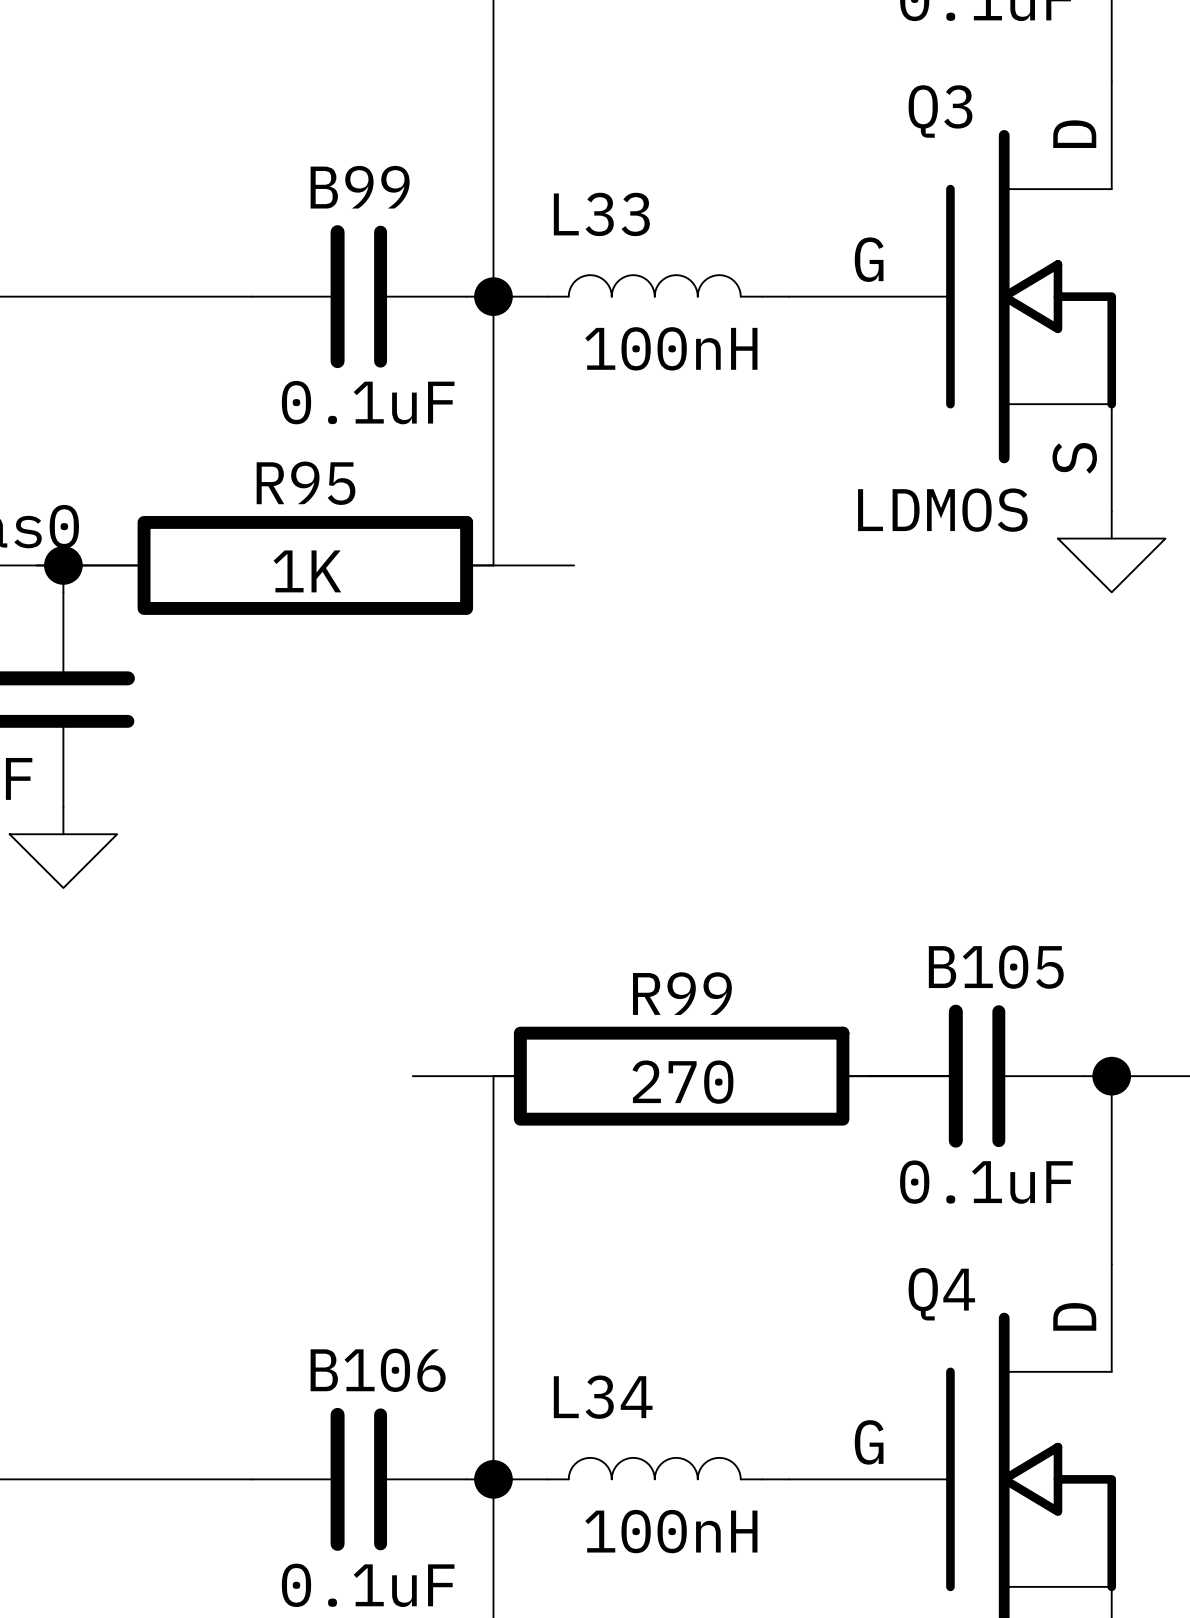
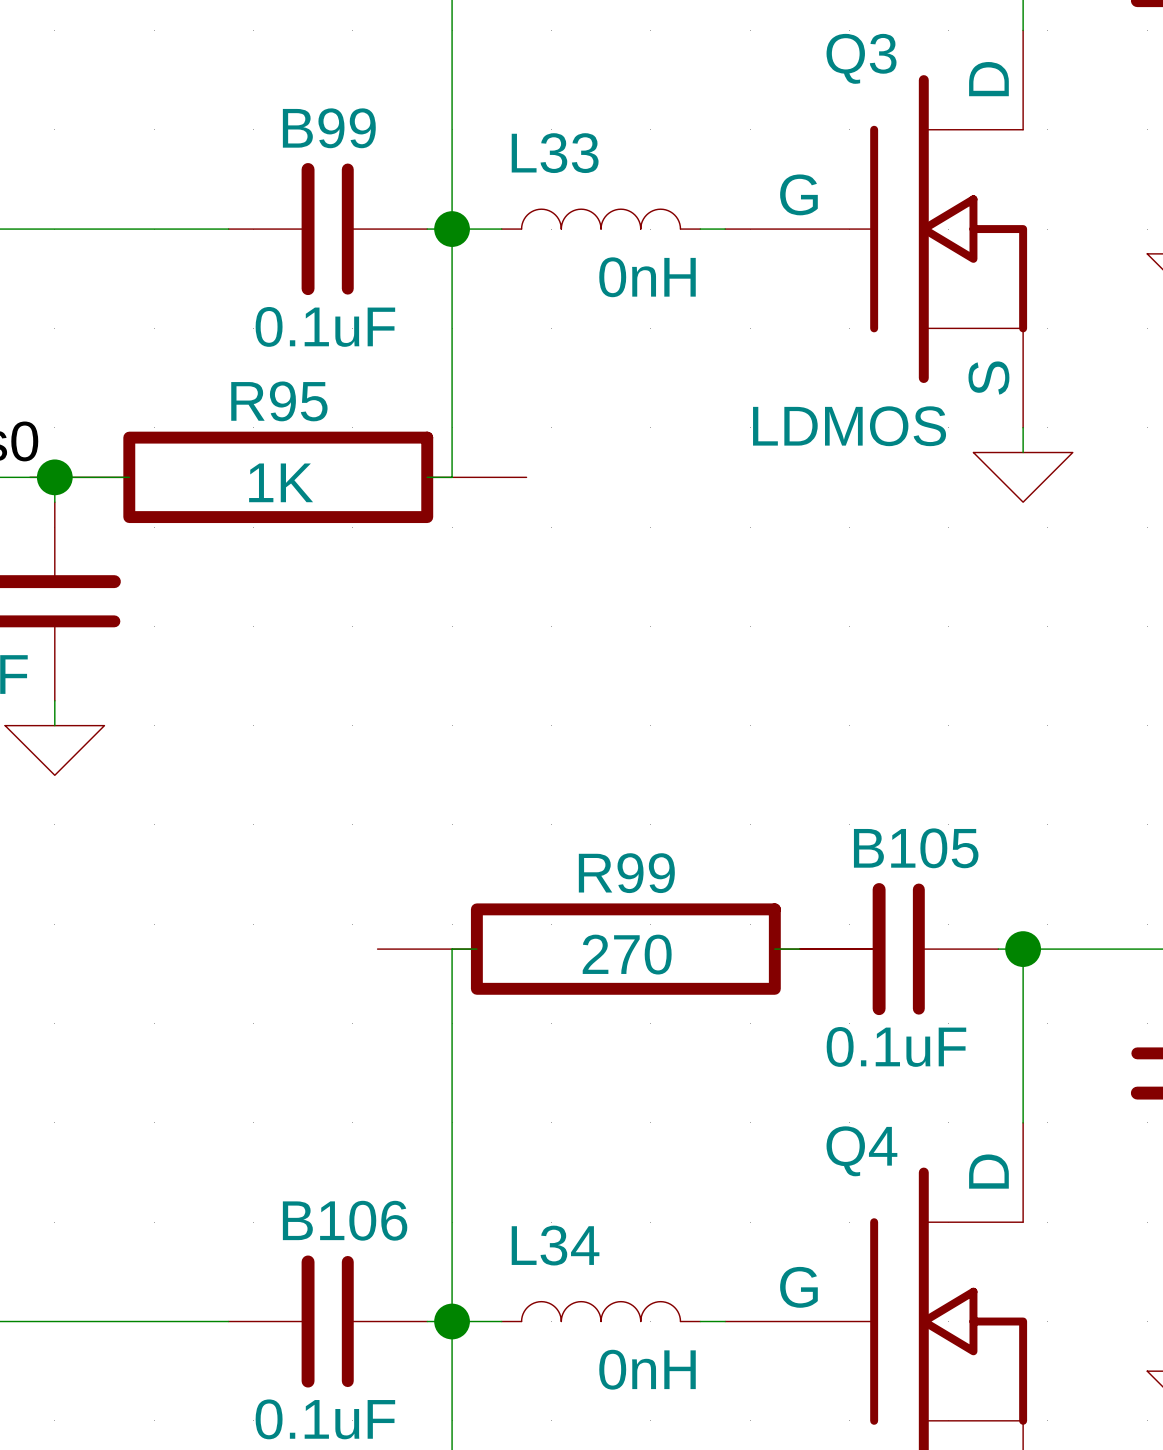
L33 value: 100nH (671, 348) -> 0nH (647, 277)
L34 value: 100nH (671, 1531) -> 0nH (647, 1369)

